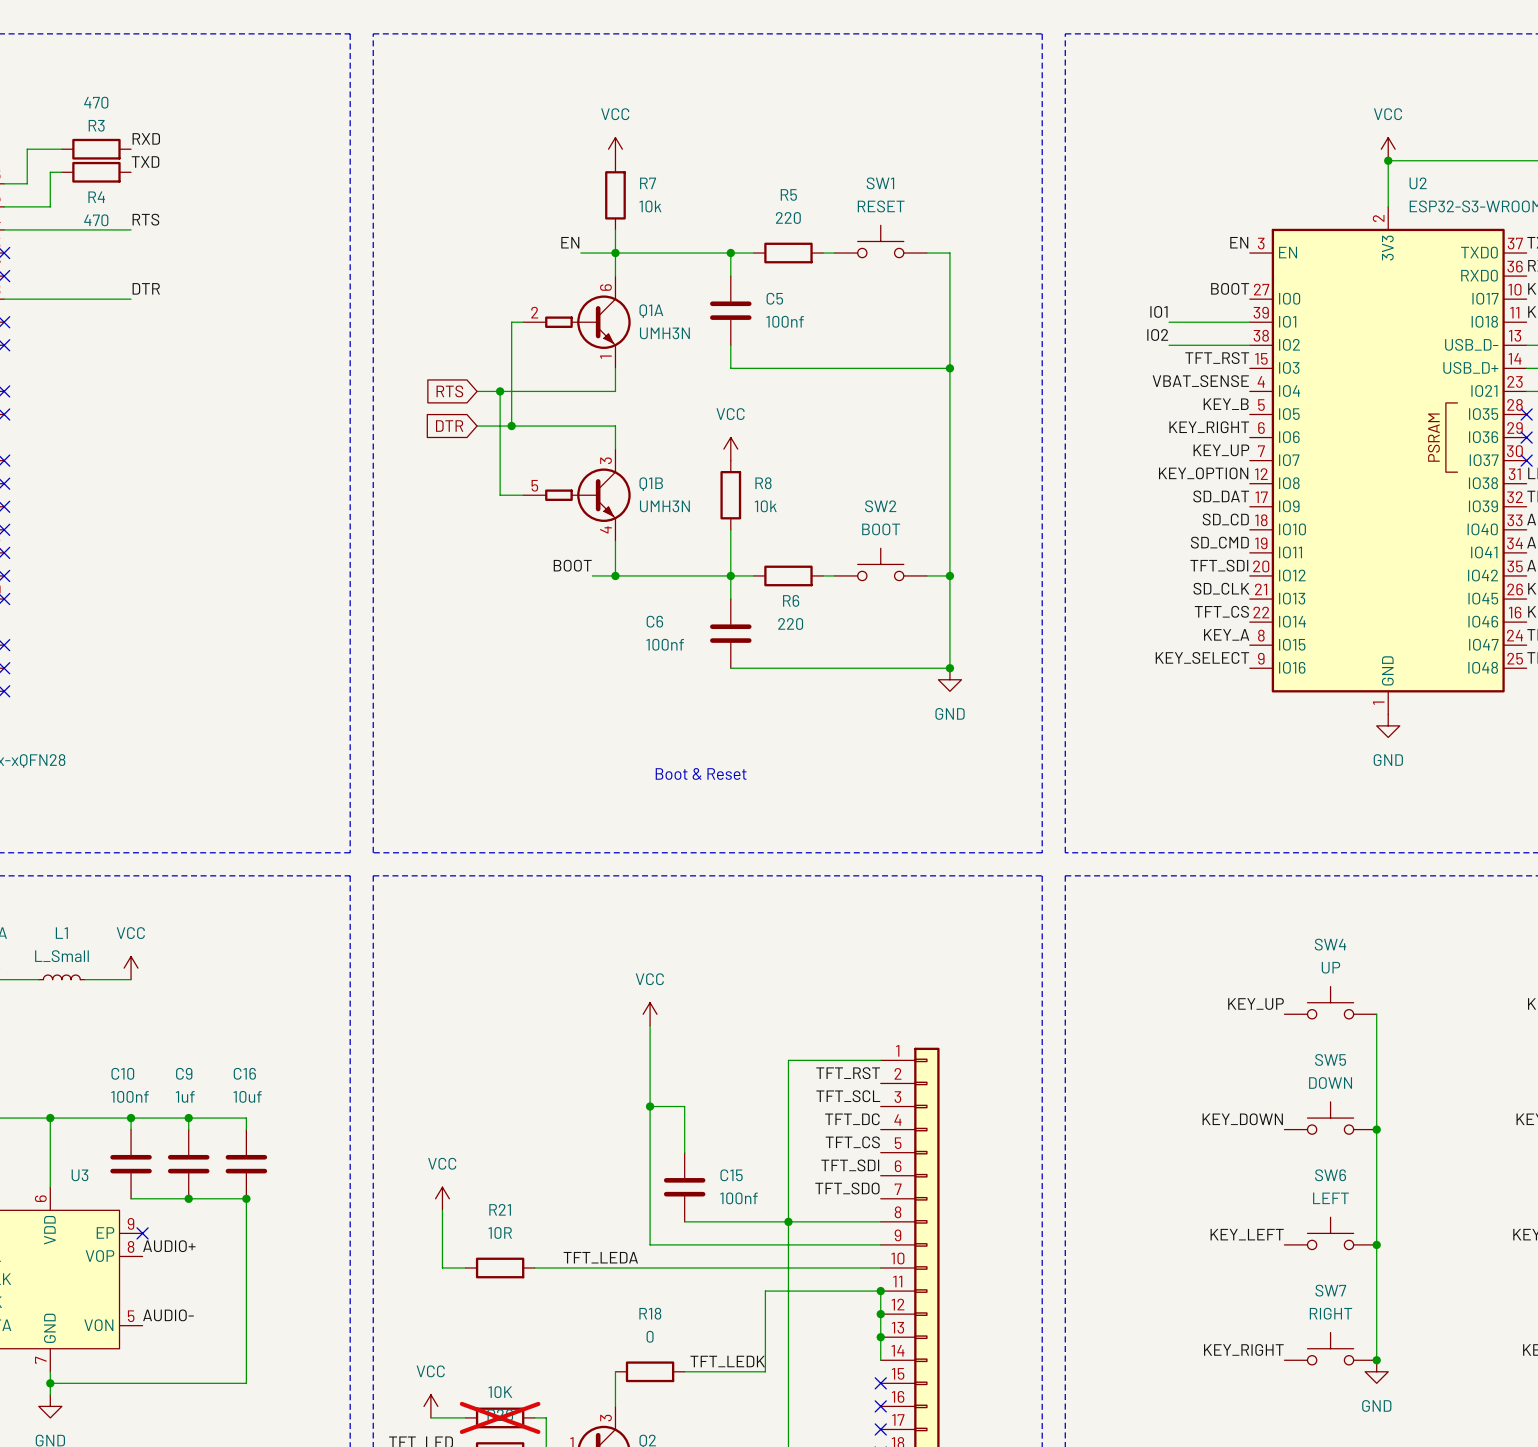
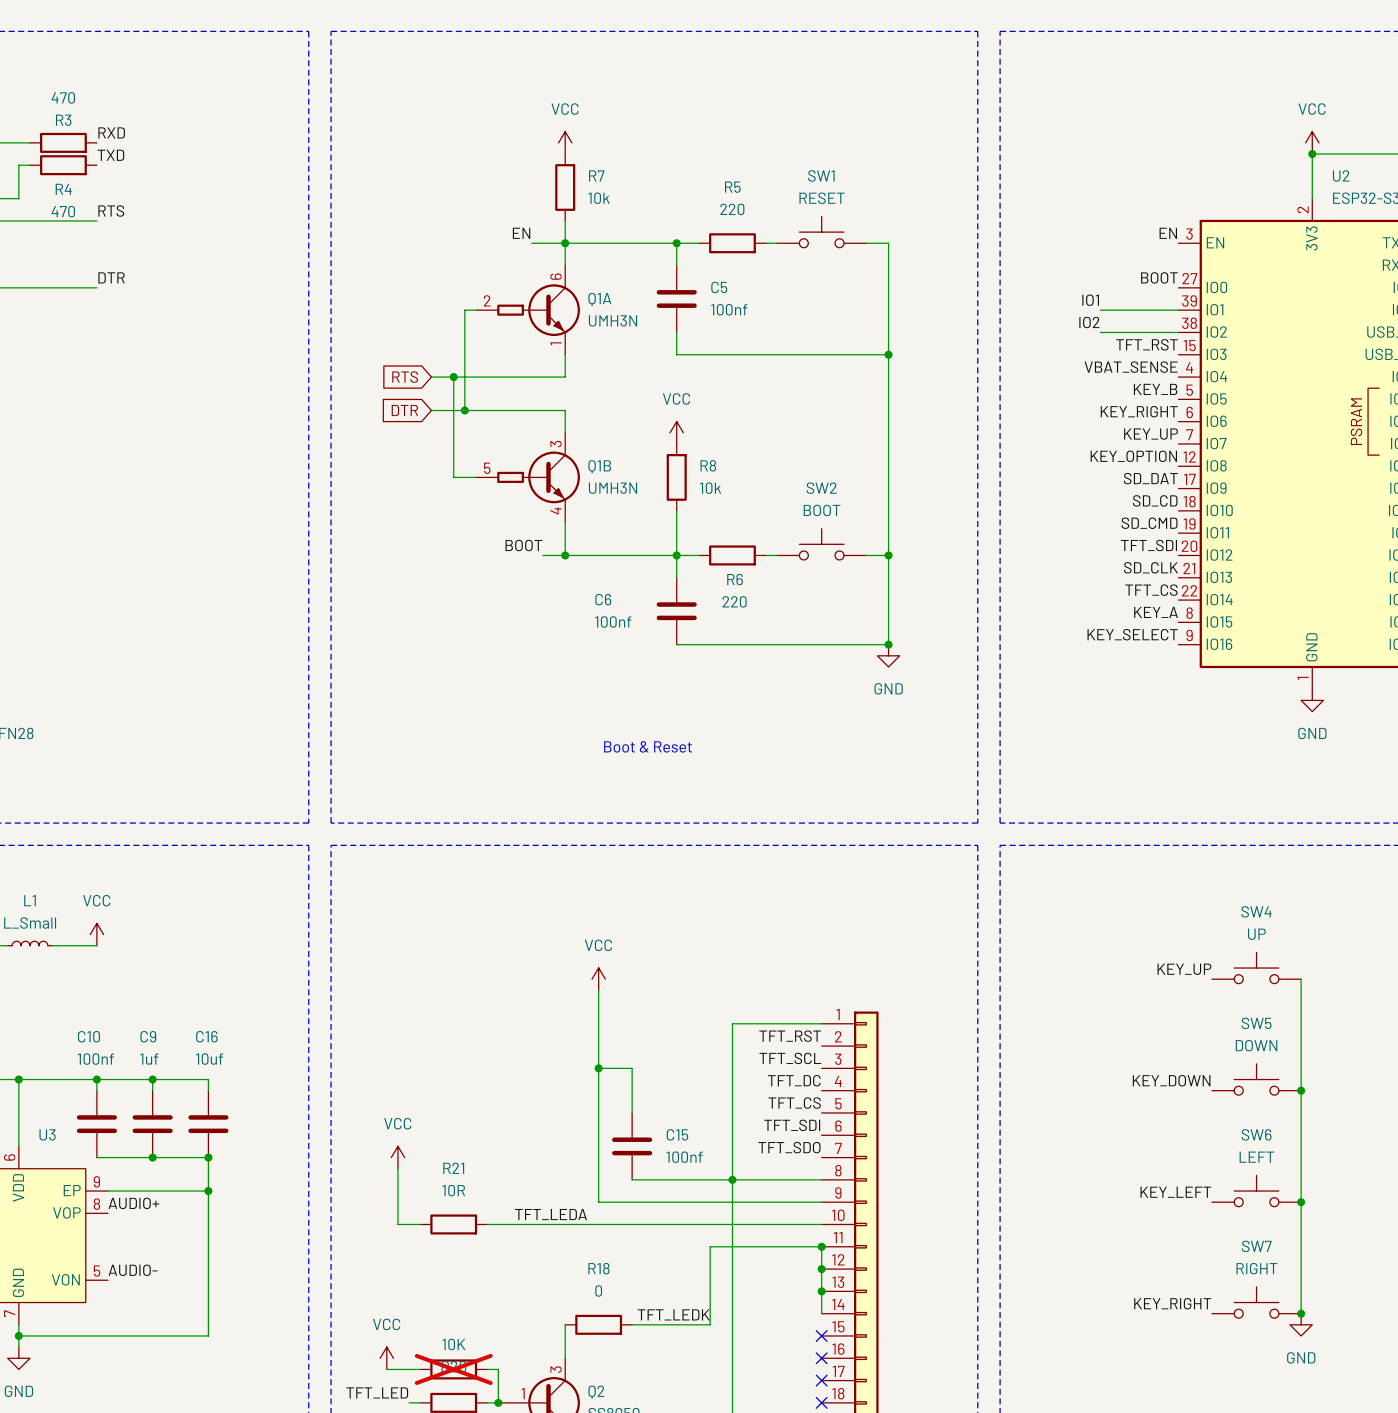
wire: none -> (108, 1191) (208, 1191)
no-connect mark: (142, 1233) -> none
junction: none -> (208, 1191)

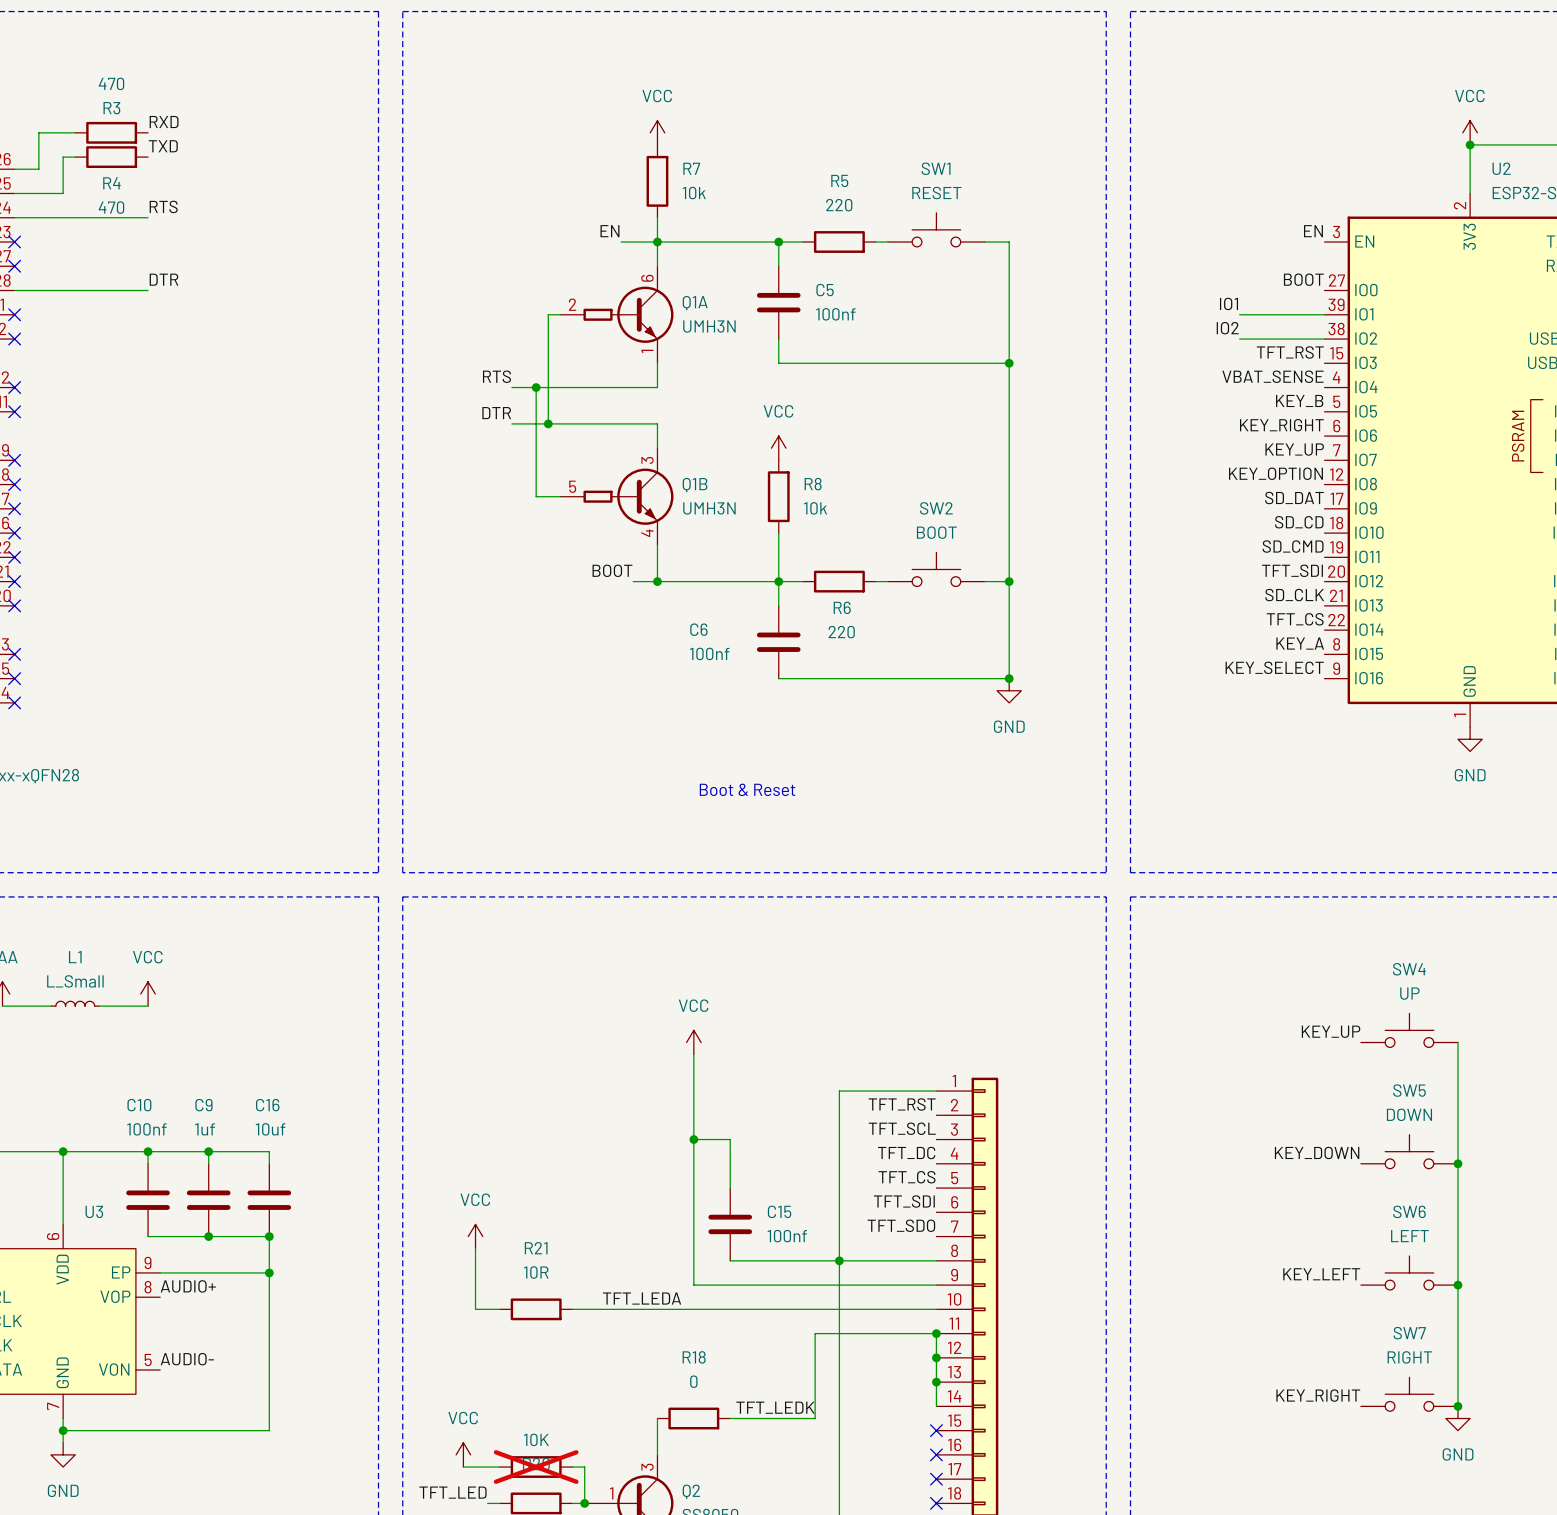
label: none -> RTS (496, 376)
global label: RTS (405, 377) -> none
label: none -> DTR (496, 413)
global label: DTR (404, 410) -> none

